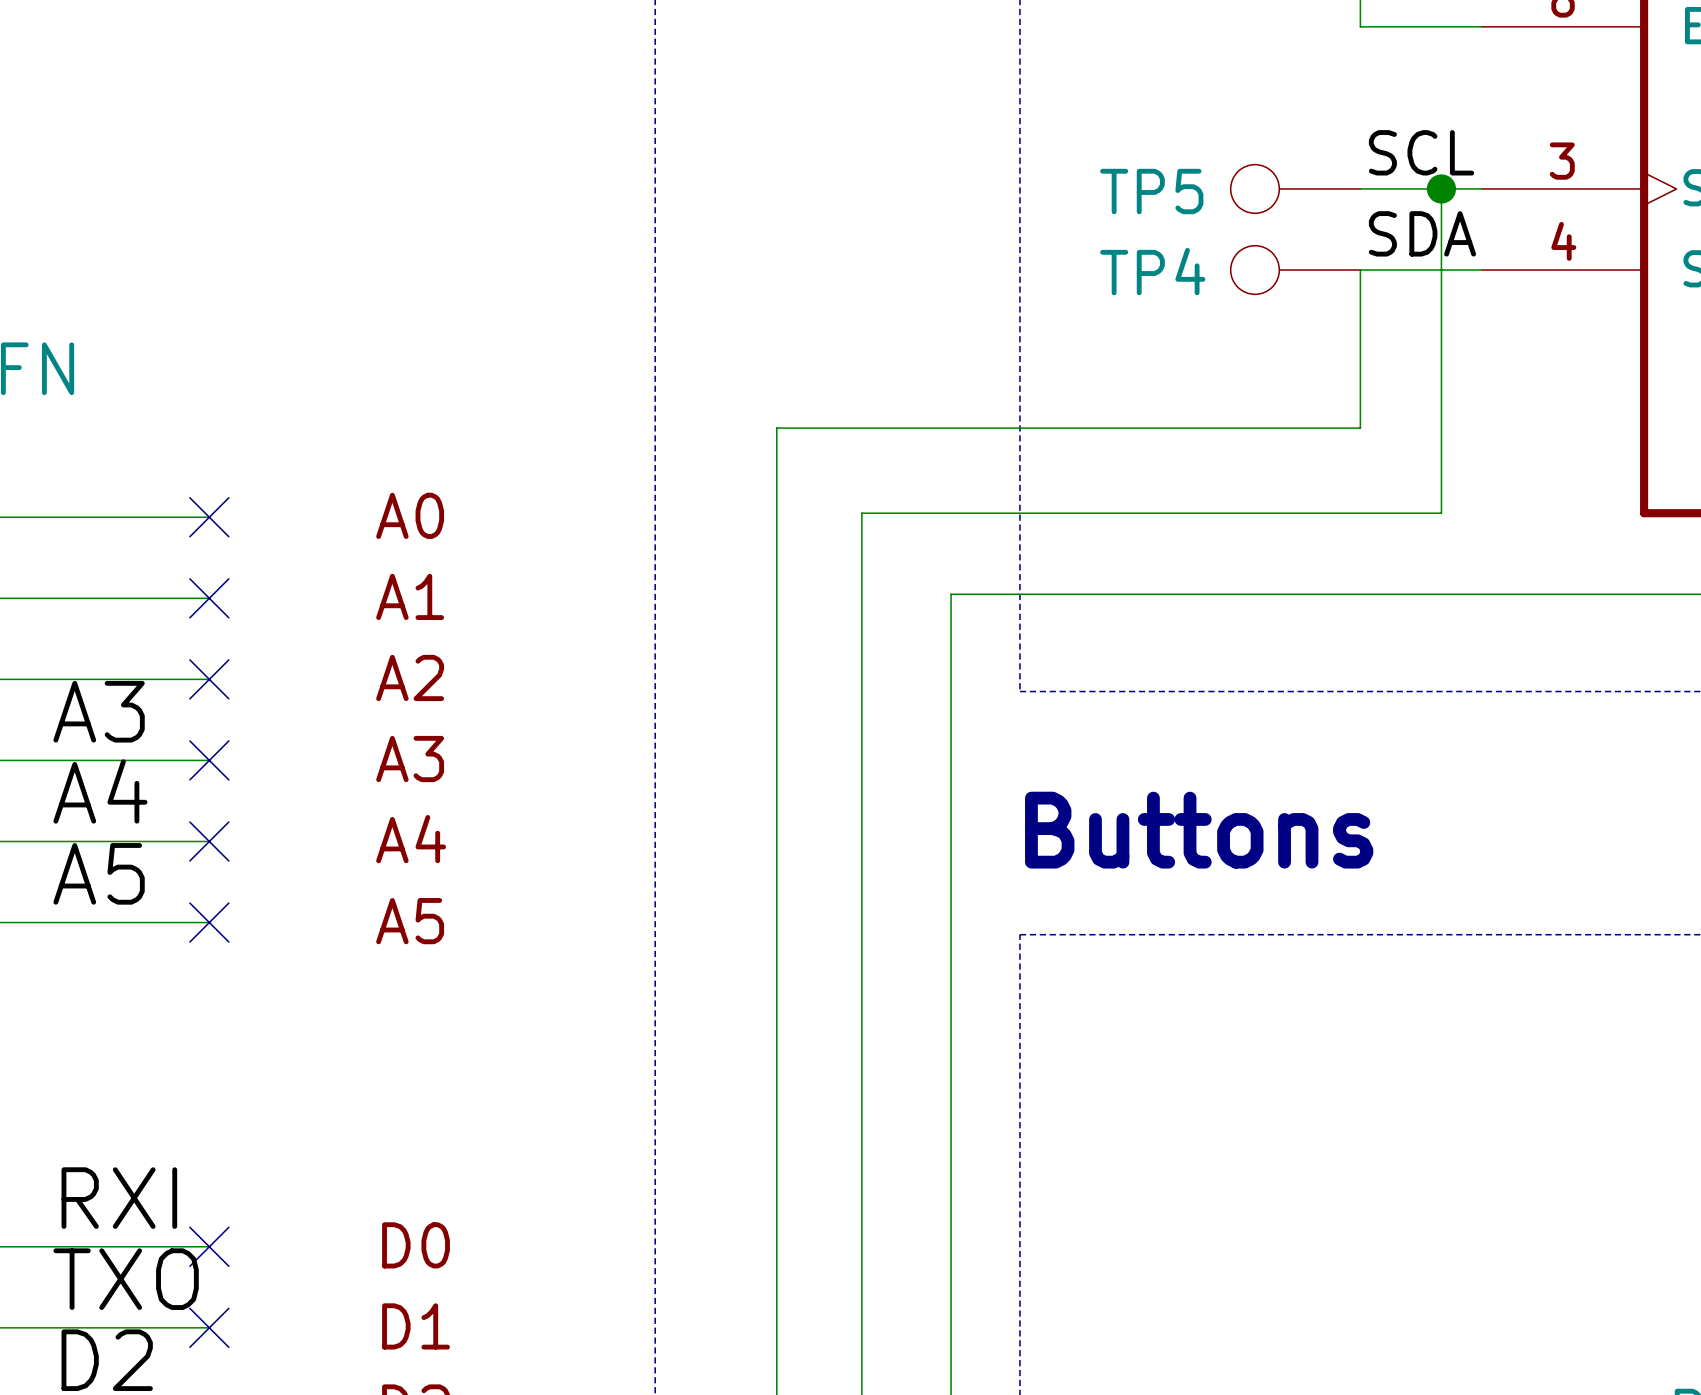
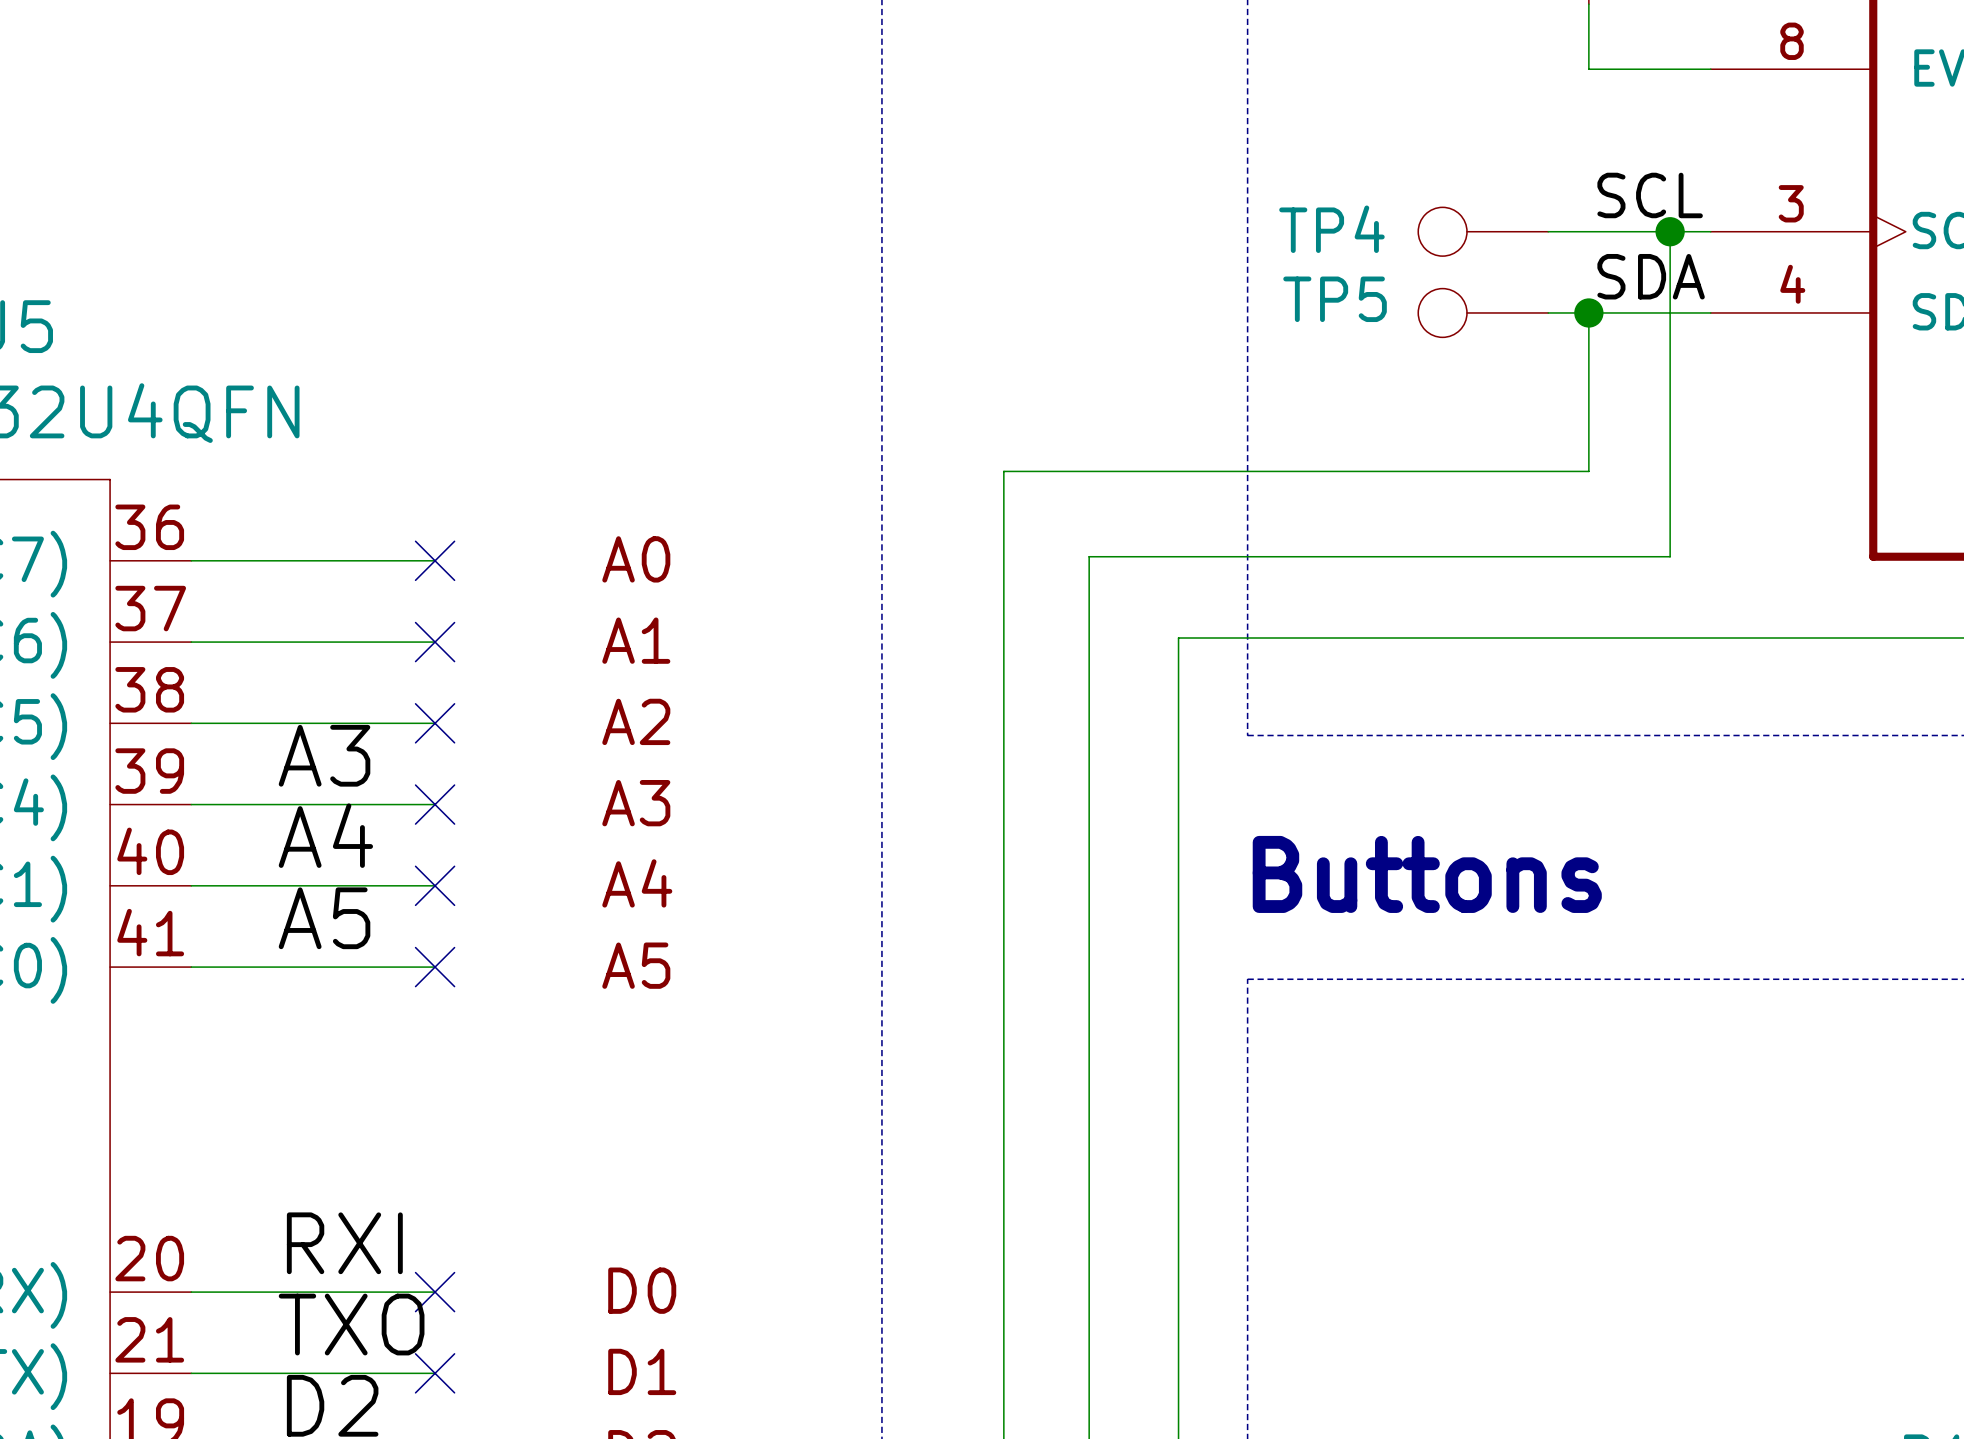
TP4 position: (1295, 188) -> (1483, 231)
TP5 name position: TP5 (1151, 191) -> TP5 (1335, 299)
TP5 position: (1295, 270) -> (1483, 312)
junction: none -> (1588, 312)
TP4 name position: TP4 (1152, 271) -> TP4 (1331, 229)

